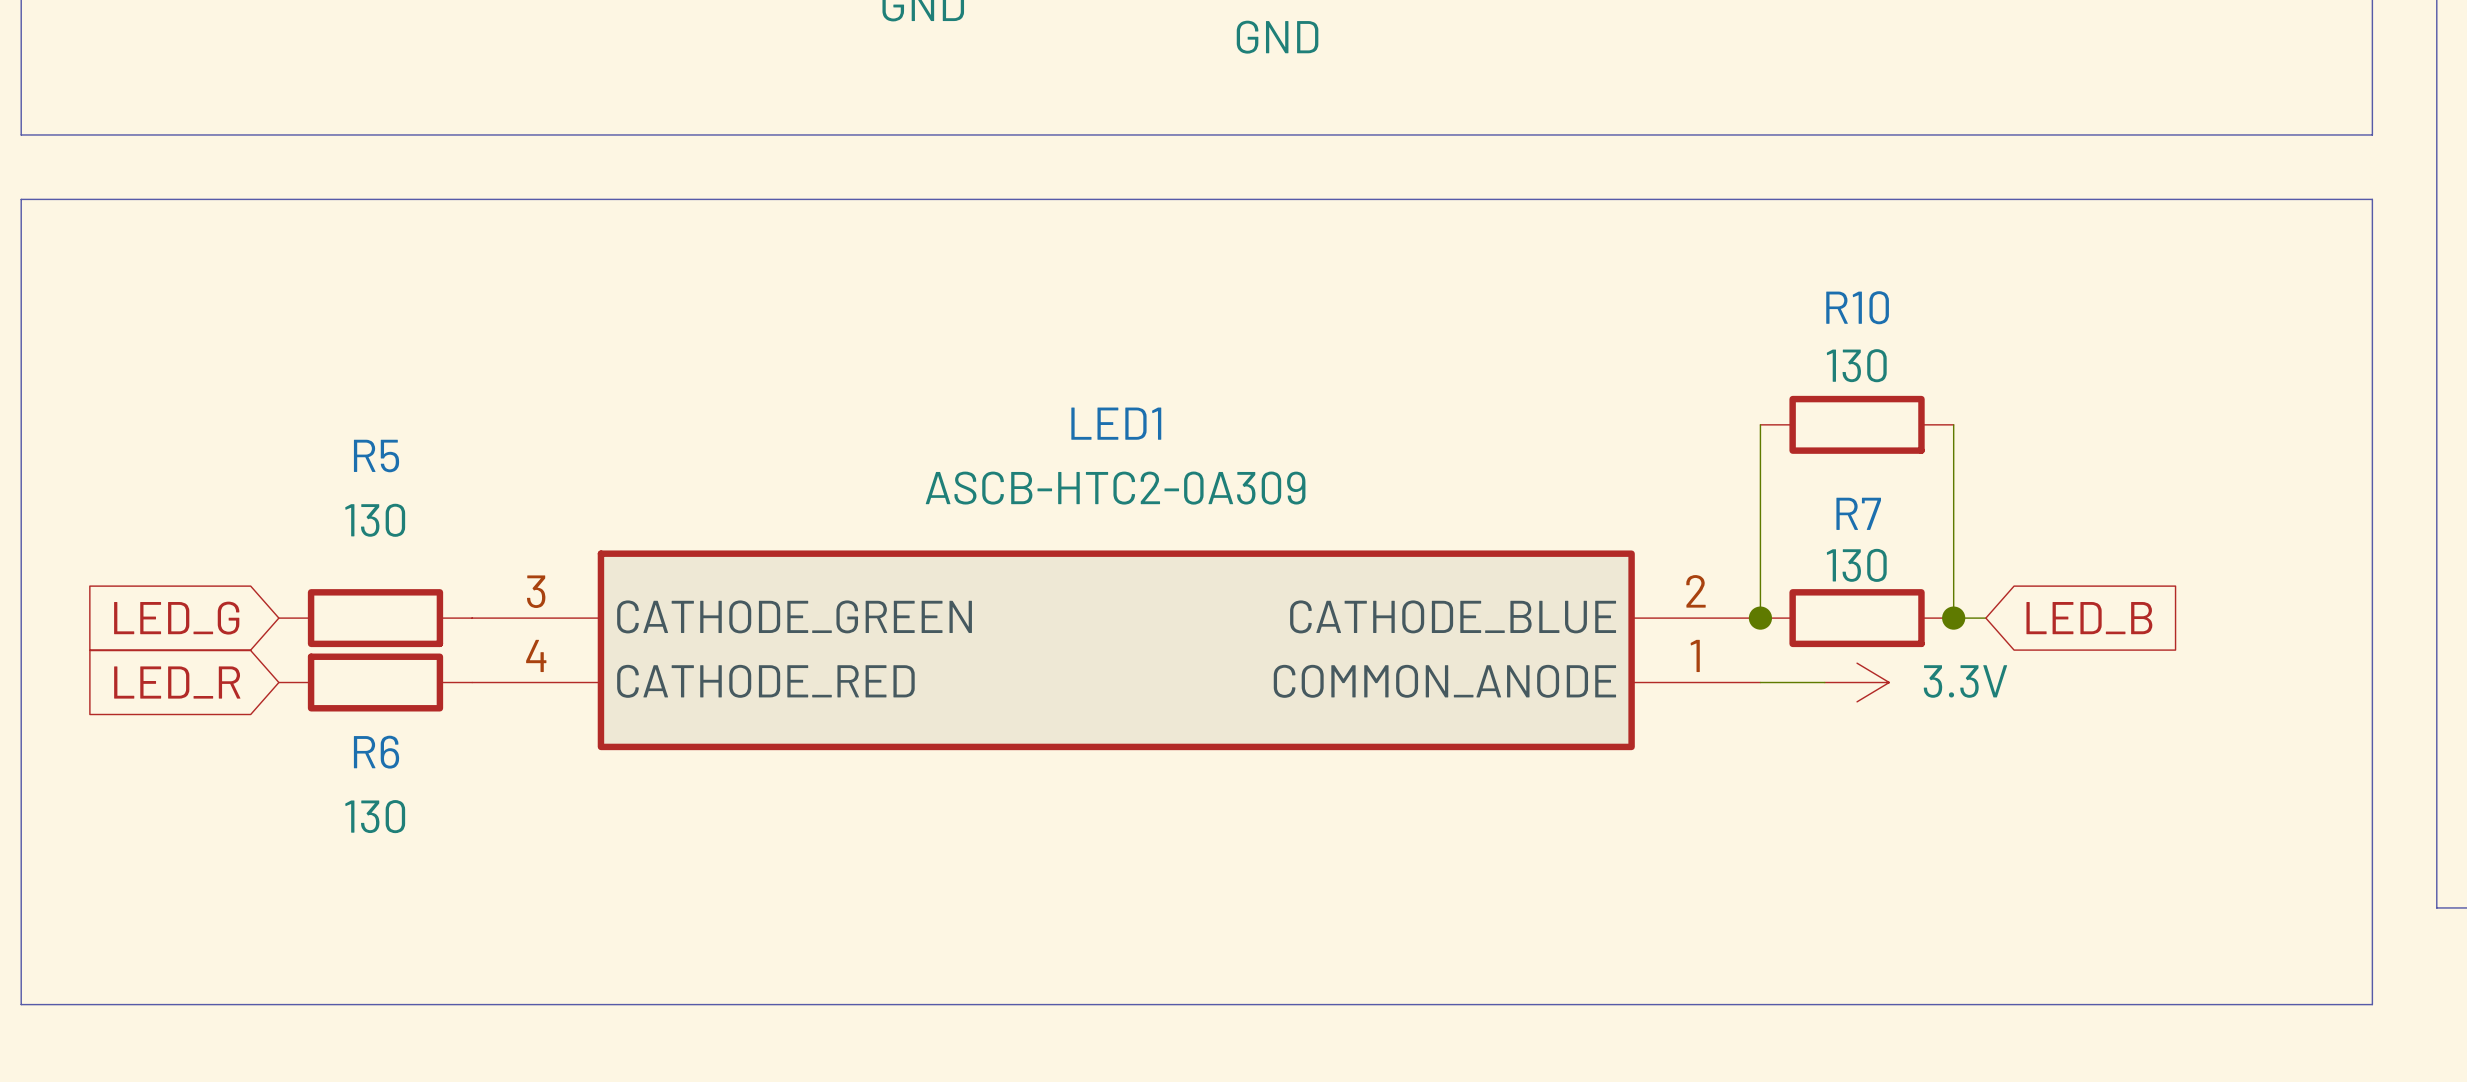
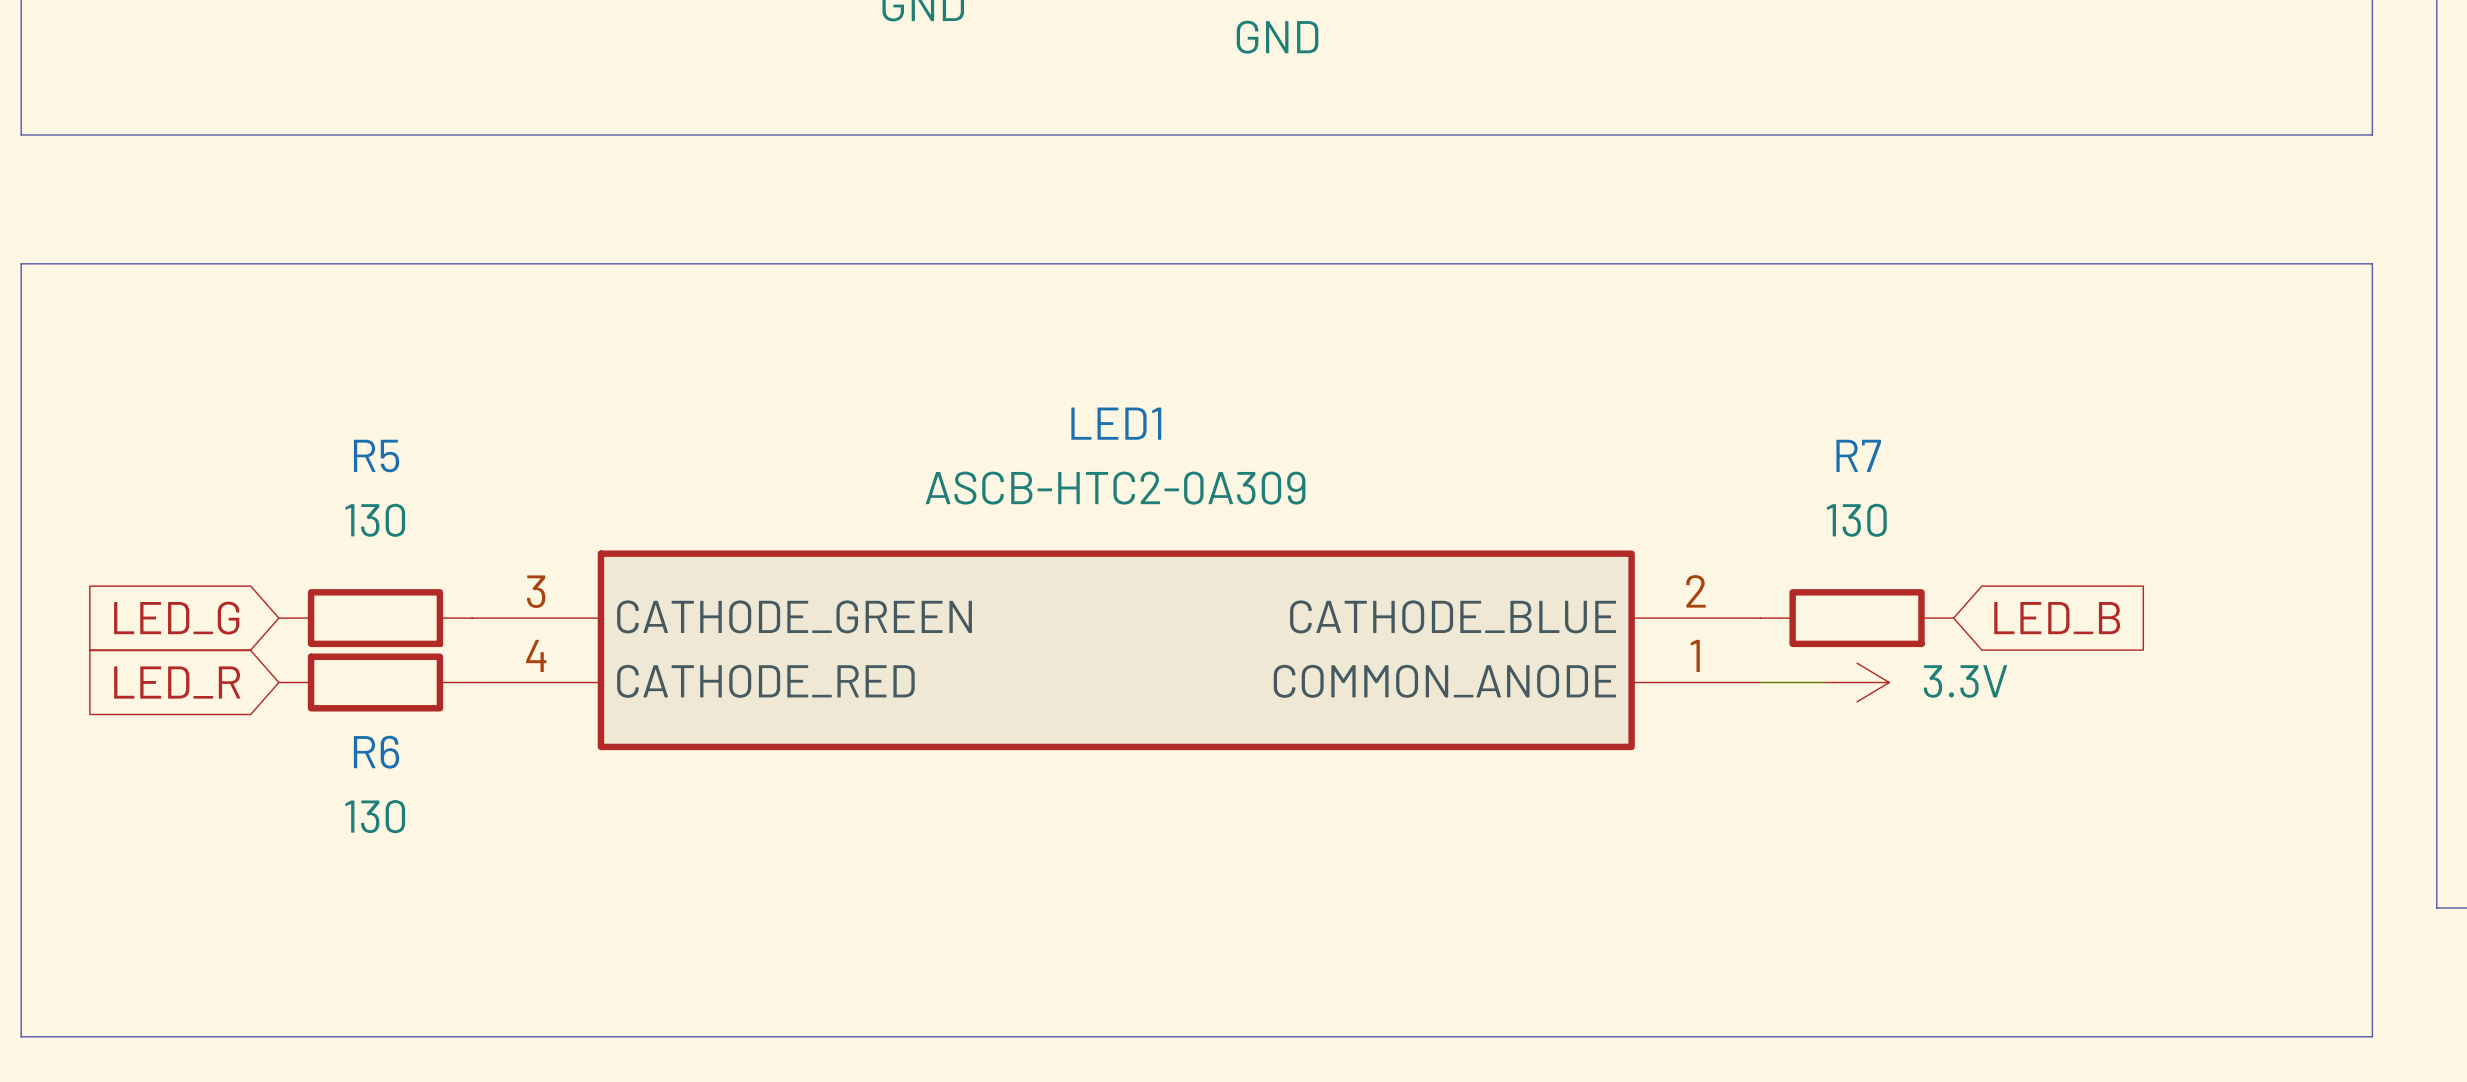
line: (21, 263) (21, 199) (2372, 199) (2372, 263) -> (21, 263) (2372, 263)
wire: (1760, 424) (1760, 618) -> none
R10: 130 (1857, 424) -> none
wire: (1953, 424) (1953, 618) (1985, 618) -> none
R7 name position: R7 (1858, 513) -> R7 (1858, 455)
R7 value position: 130 (1856, 565) -> 130 (1856, 520)
junction: (1760, 618) -> none
junction: (1953, 618) -> none
global label position: LED_B (2089, 618) -> LED_B (2057, 618)
line: (21, 1004) (2372, 1004) -> (21, 1004) (21, 1036) (2372, 1036) (2372, 1004)

